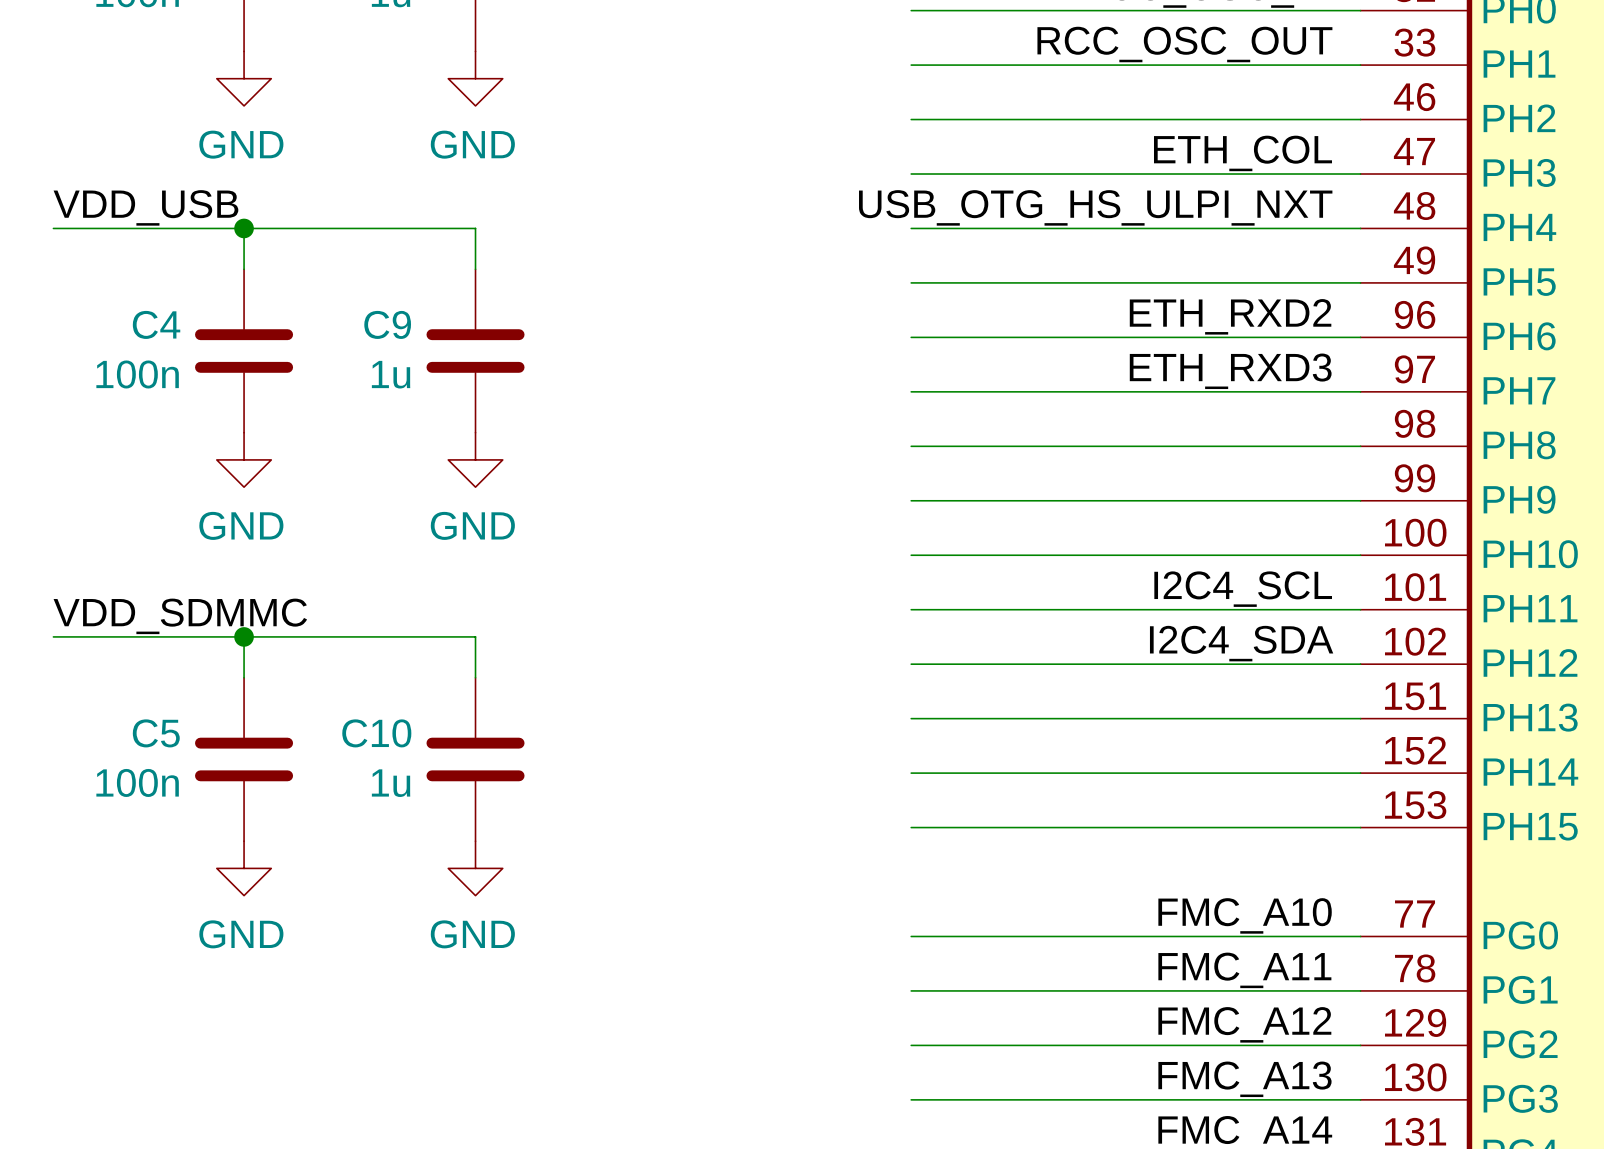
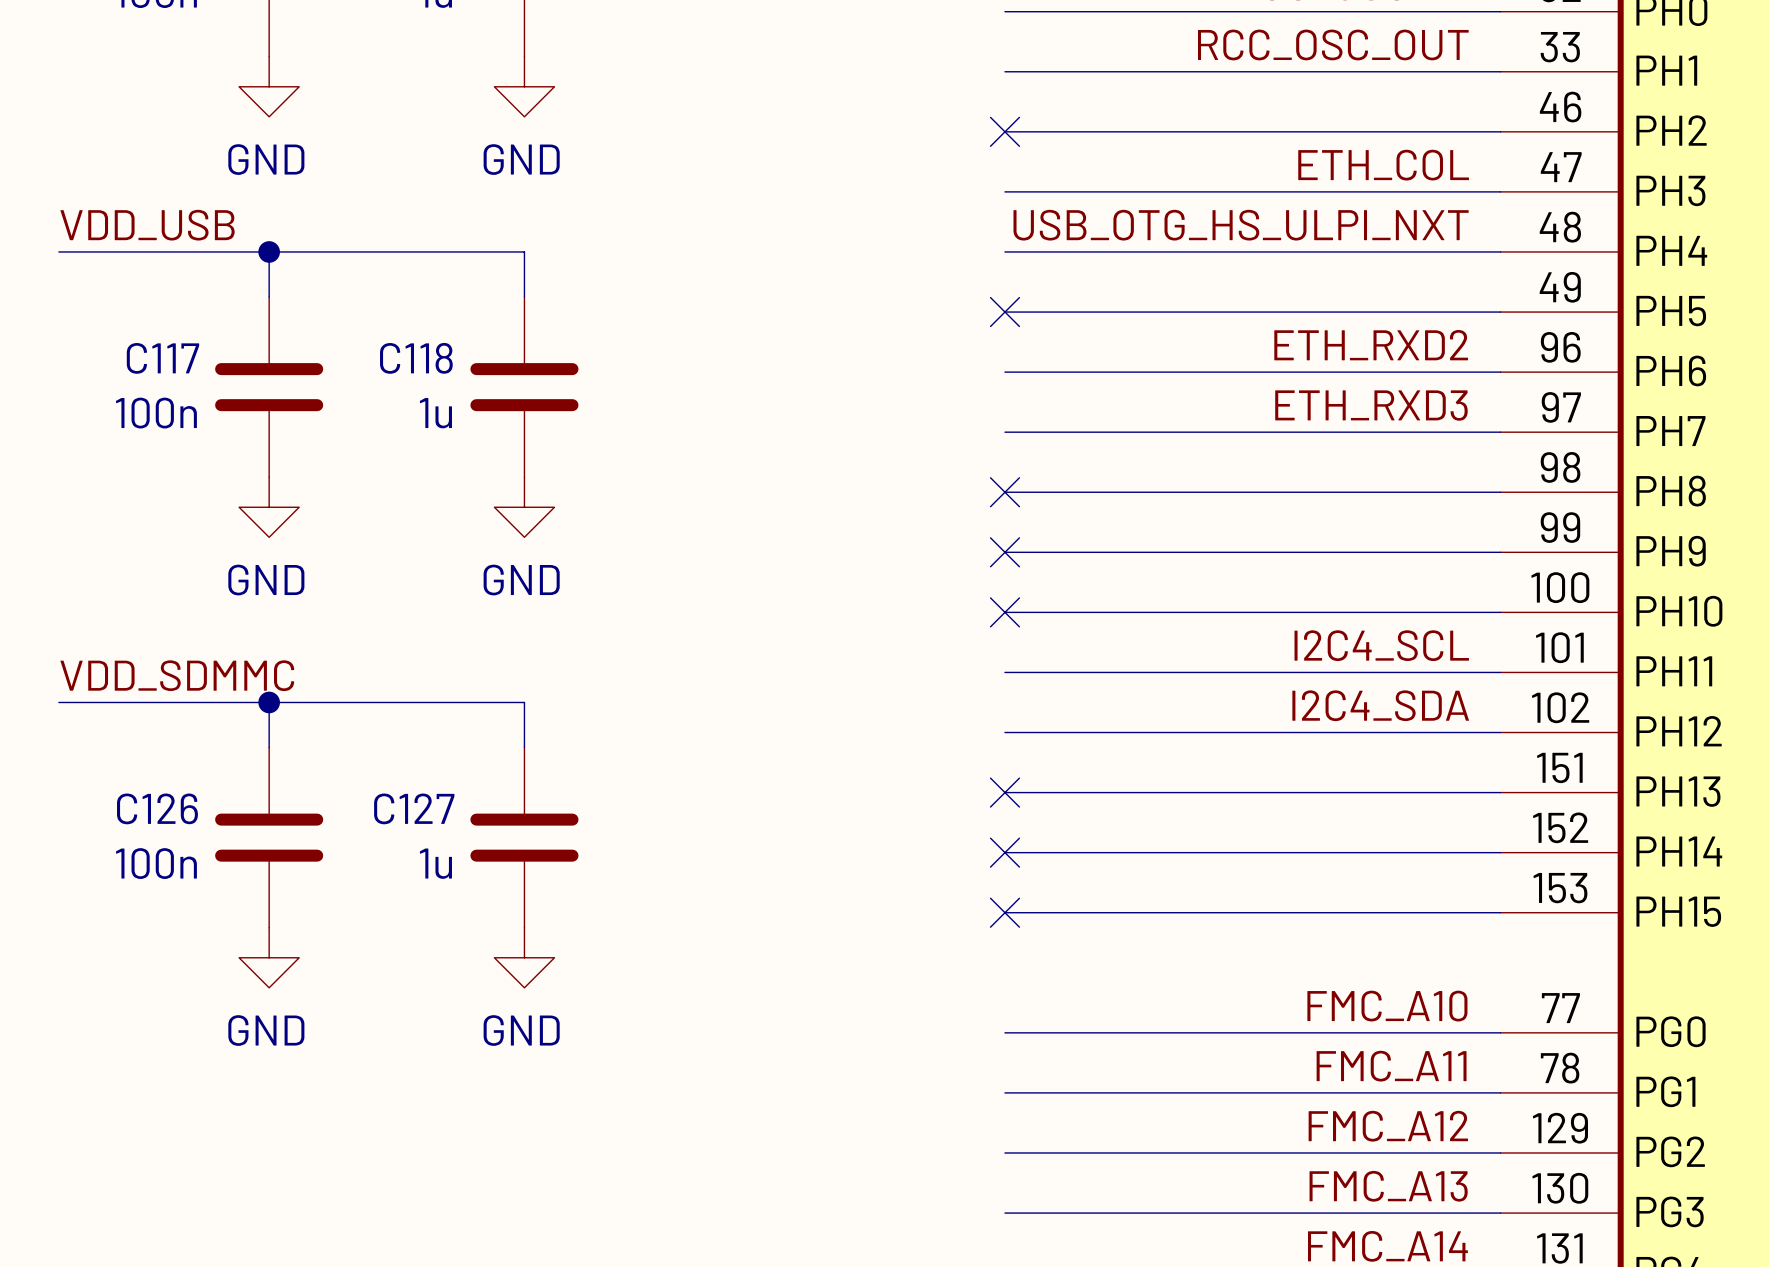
no-connect mark: none -> (1004, 131)
no-connect mark: none -> (1004, 312)
C4 name: C4 (156, 324) -> C117 (162, 358)
C9 name: C9 (387, 324) -> C118 (416, 358)
no-connect mark: none -> (1004, 492)
no-connect mark: none -> (1004, 552)
no-connect mark: none -> (1004, 612)
no-connect mark: none -> (1004, 792)
C5 name: C5 (156, 733) -> C126 (157, 808)
C10 name: C10 (376, 733) -> C127 (414, 808)
no-connect mark: none -> (1004, 852)
no-connect mark: none -> (1004, 912)

